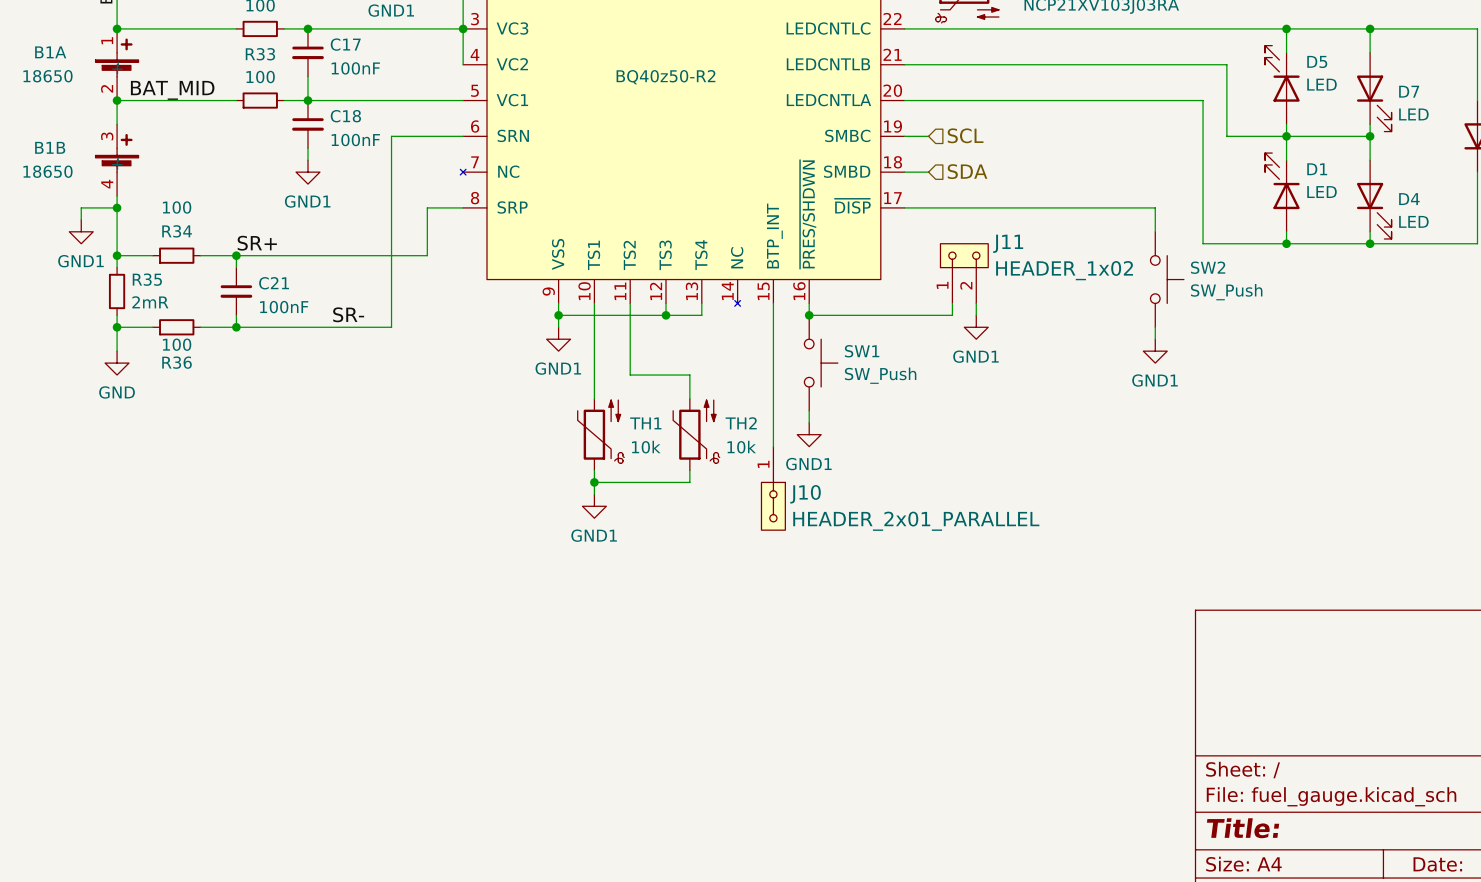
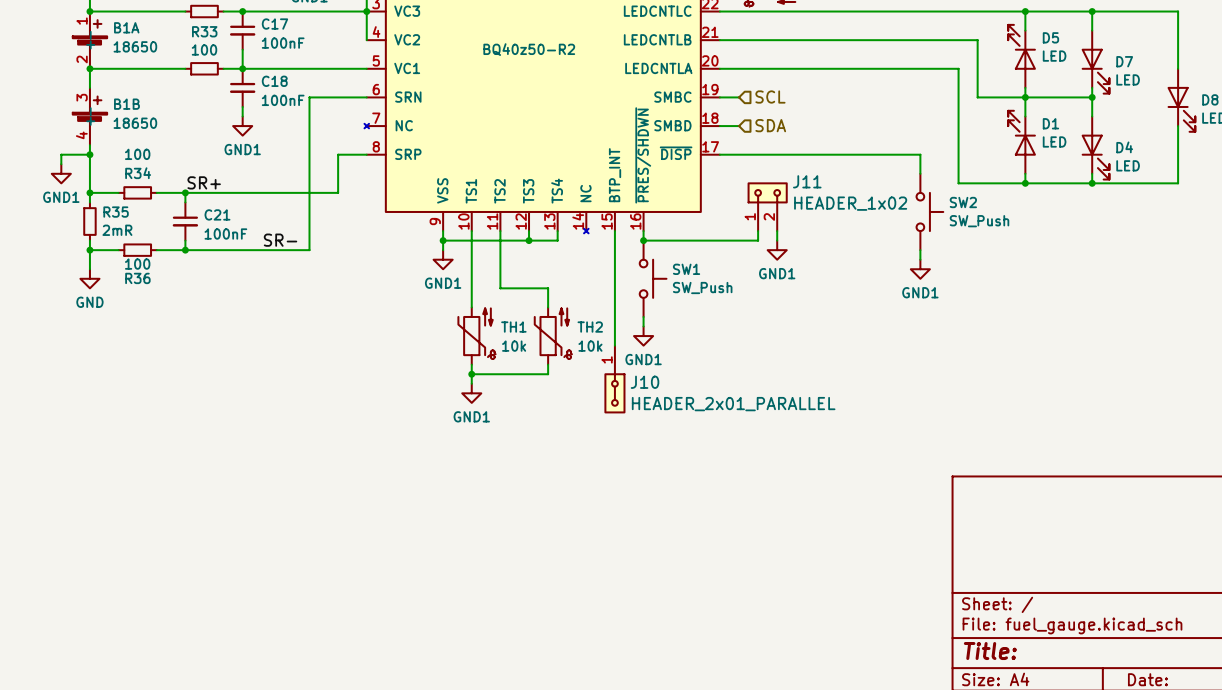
B1A name position: B1A (50, 52) -> B1A (126, 27)
B1A value position: 18650 (47, 76) -> 18650 (135, 46)
label: BAT_MID (172, 90) -> none
B1B name position: B1B (50, 147) -> B1B (126, 104)
B1B value position: 18650 (47, 171) -> 18650 (135, 123)

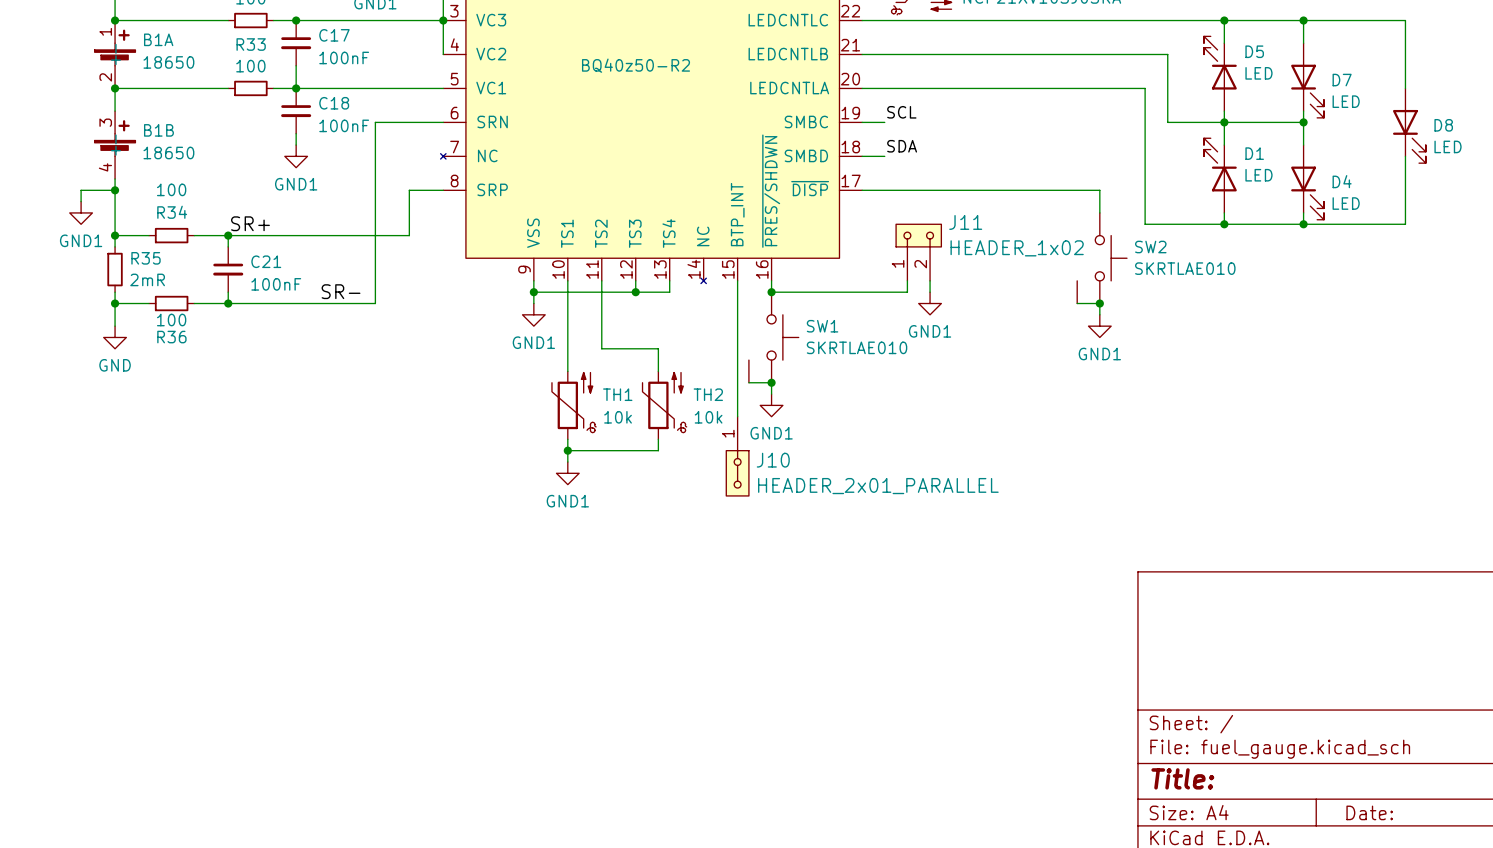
label: none -> SCL (901, 112)
hierarchical label: SCL (770, 97) -> none
label: none -> SDA (902, 146)
hierarchical label: SDA (770, 125) -> none
SW2 symbol: [916, 173, 944, 251] -> [1077, 212, 1127, 304]
SW2 value: SW_Push (979, 221) -> SKRTLAE010 (1185, 268)
SW1 symbol: [639, 240, 667, 317] -> [748, 292, 799, 383]
wire: none -> (1077, 303) (1099, 303)
junction: none -> (1099, 303)
SW1 value: SW_Push (702, 288) -> SKRTLAE010 (857, 347)
wire: none -> (748, 382) (771, 382)
junction: none -> (771, 382)

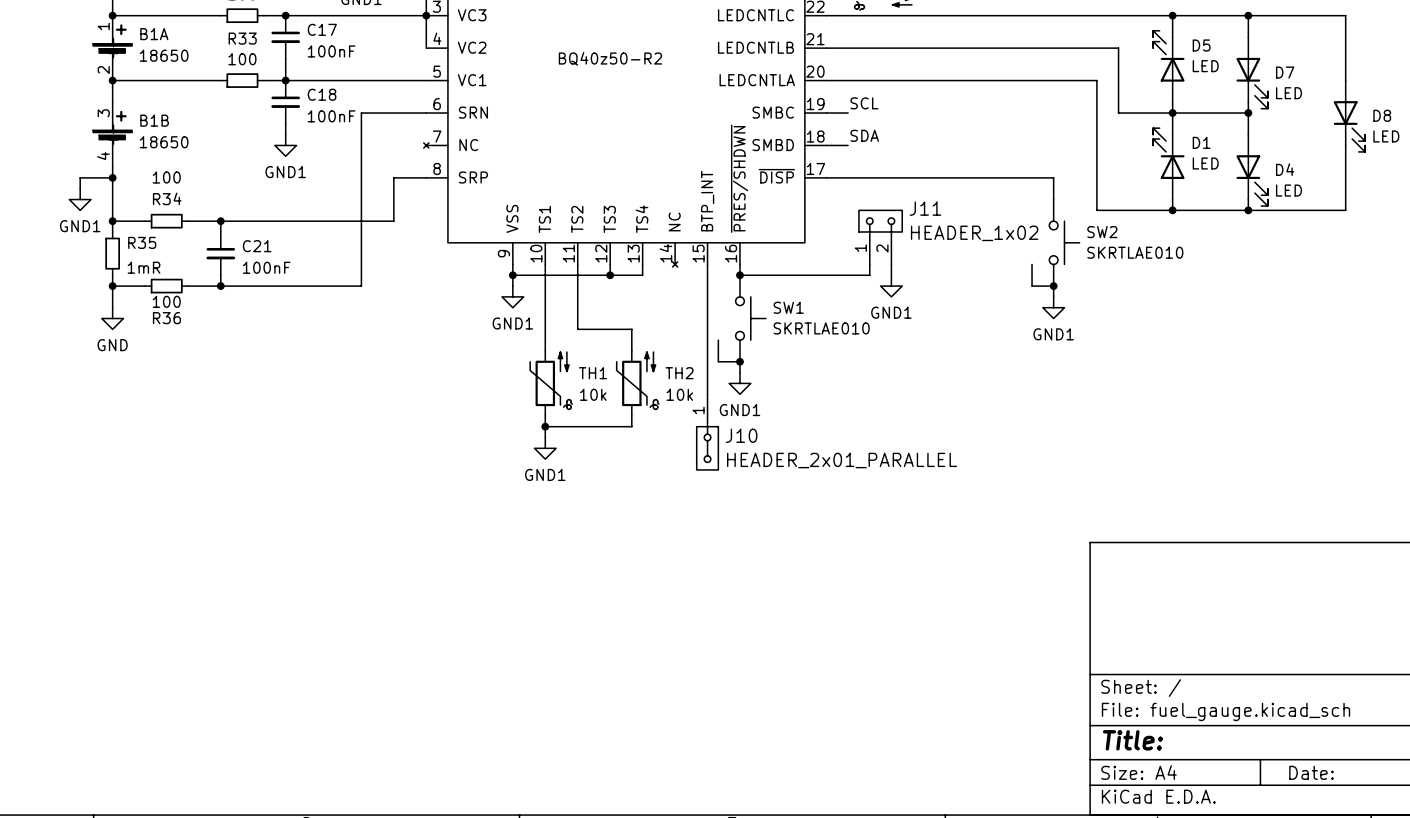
label: SR+ (250, 223) -> none
R35 value: 2mR (147, 279) -> 1mR (144, 267)
label: SR- (341, 291) -> none

